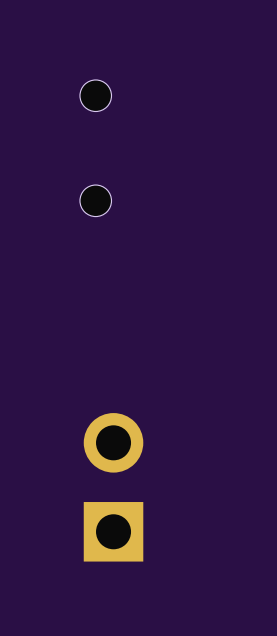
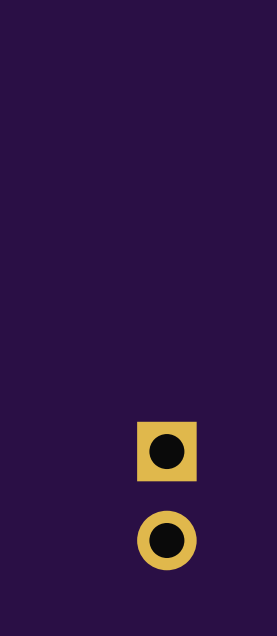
part: (95, 148) -> none
part rotation: 0° (113, 487) -> 180° (166, 496)

